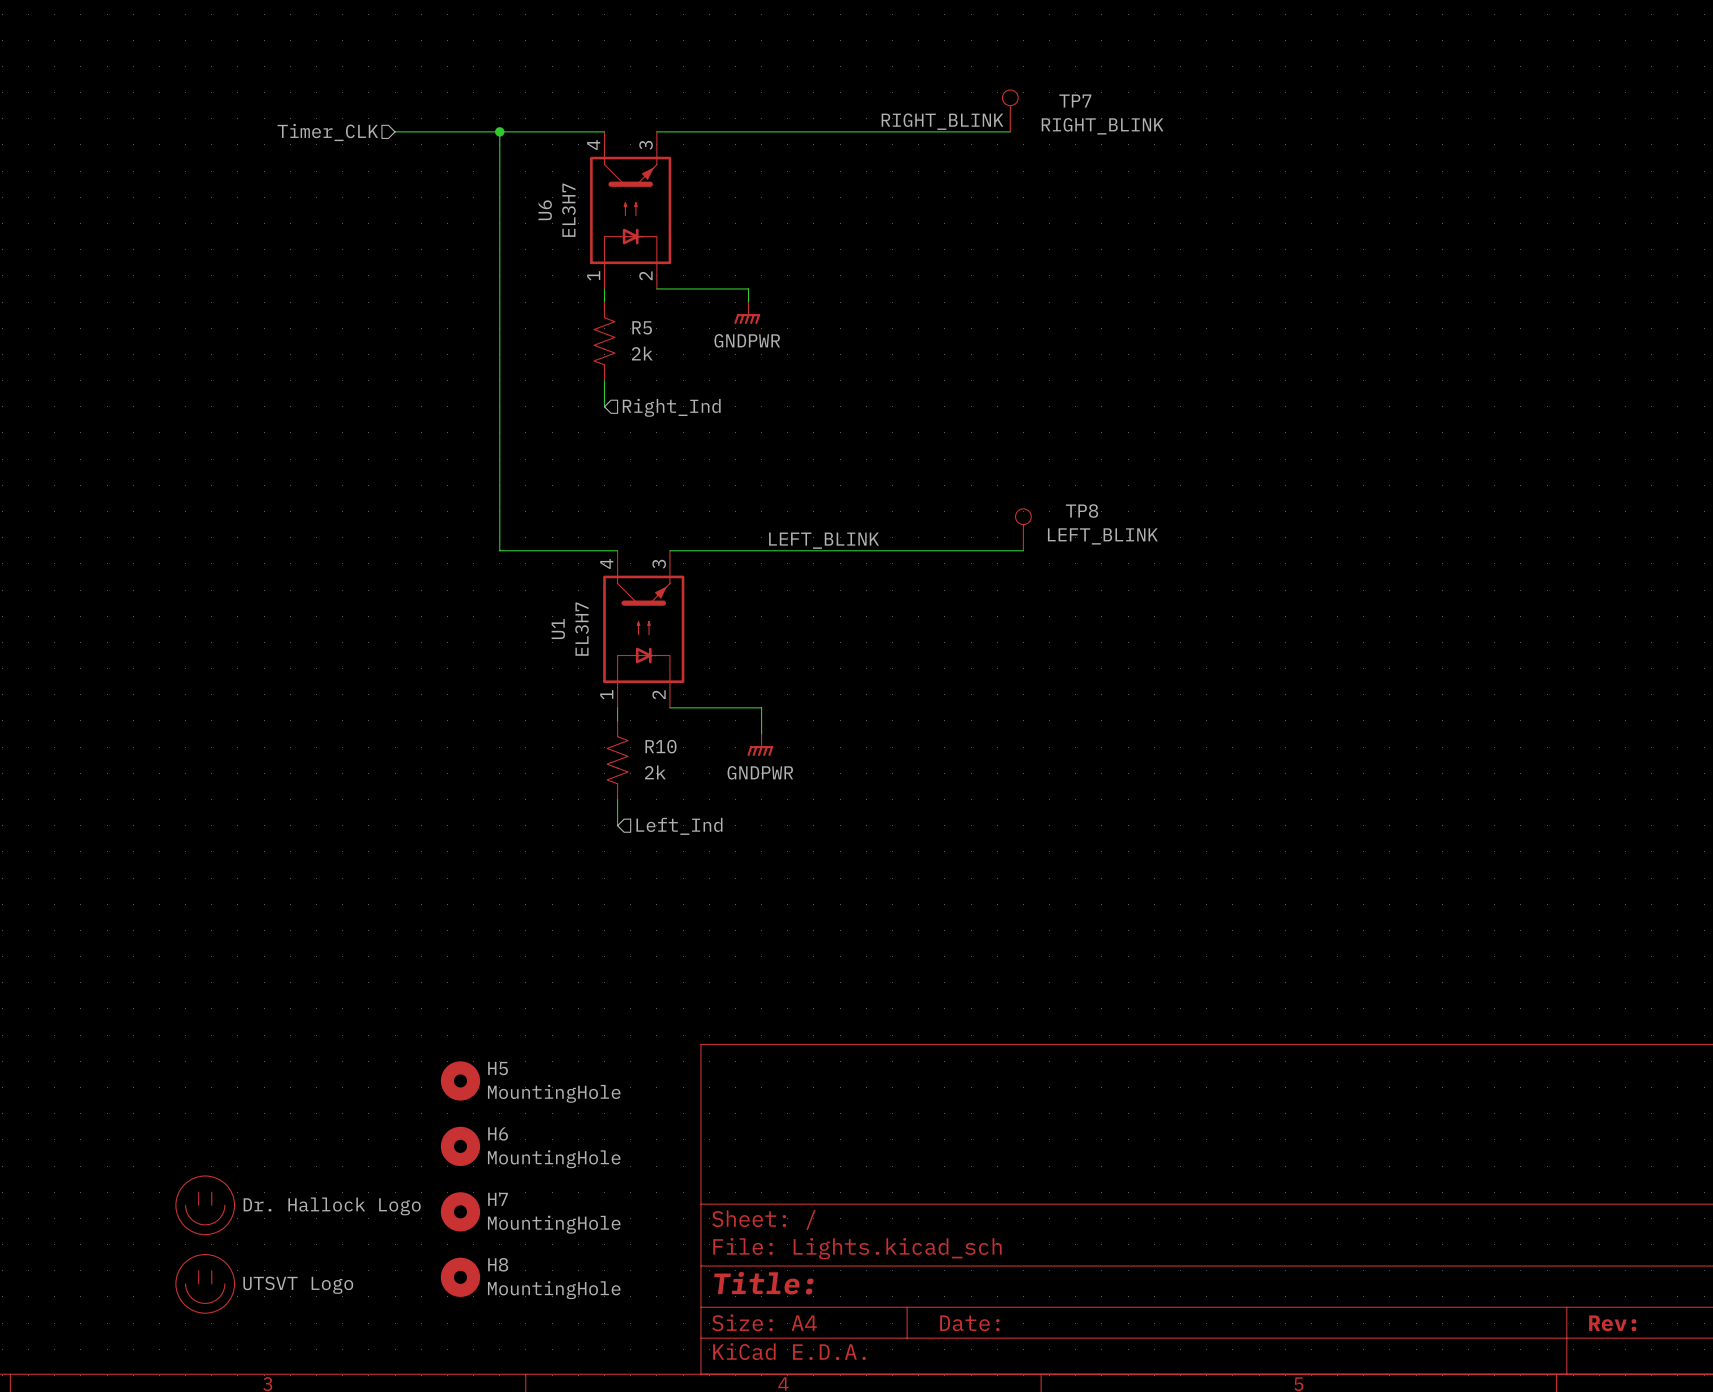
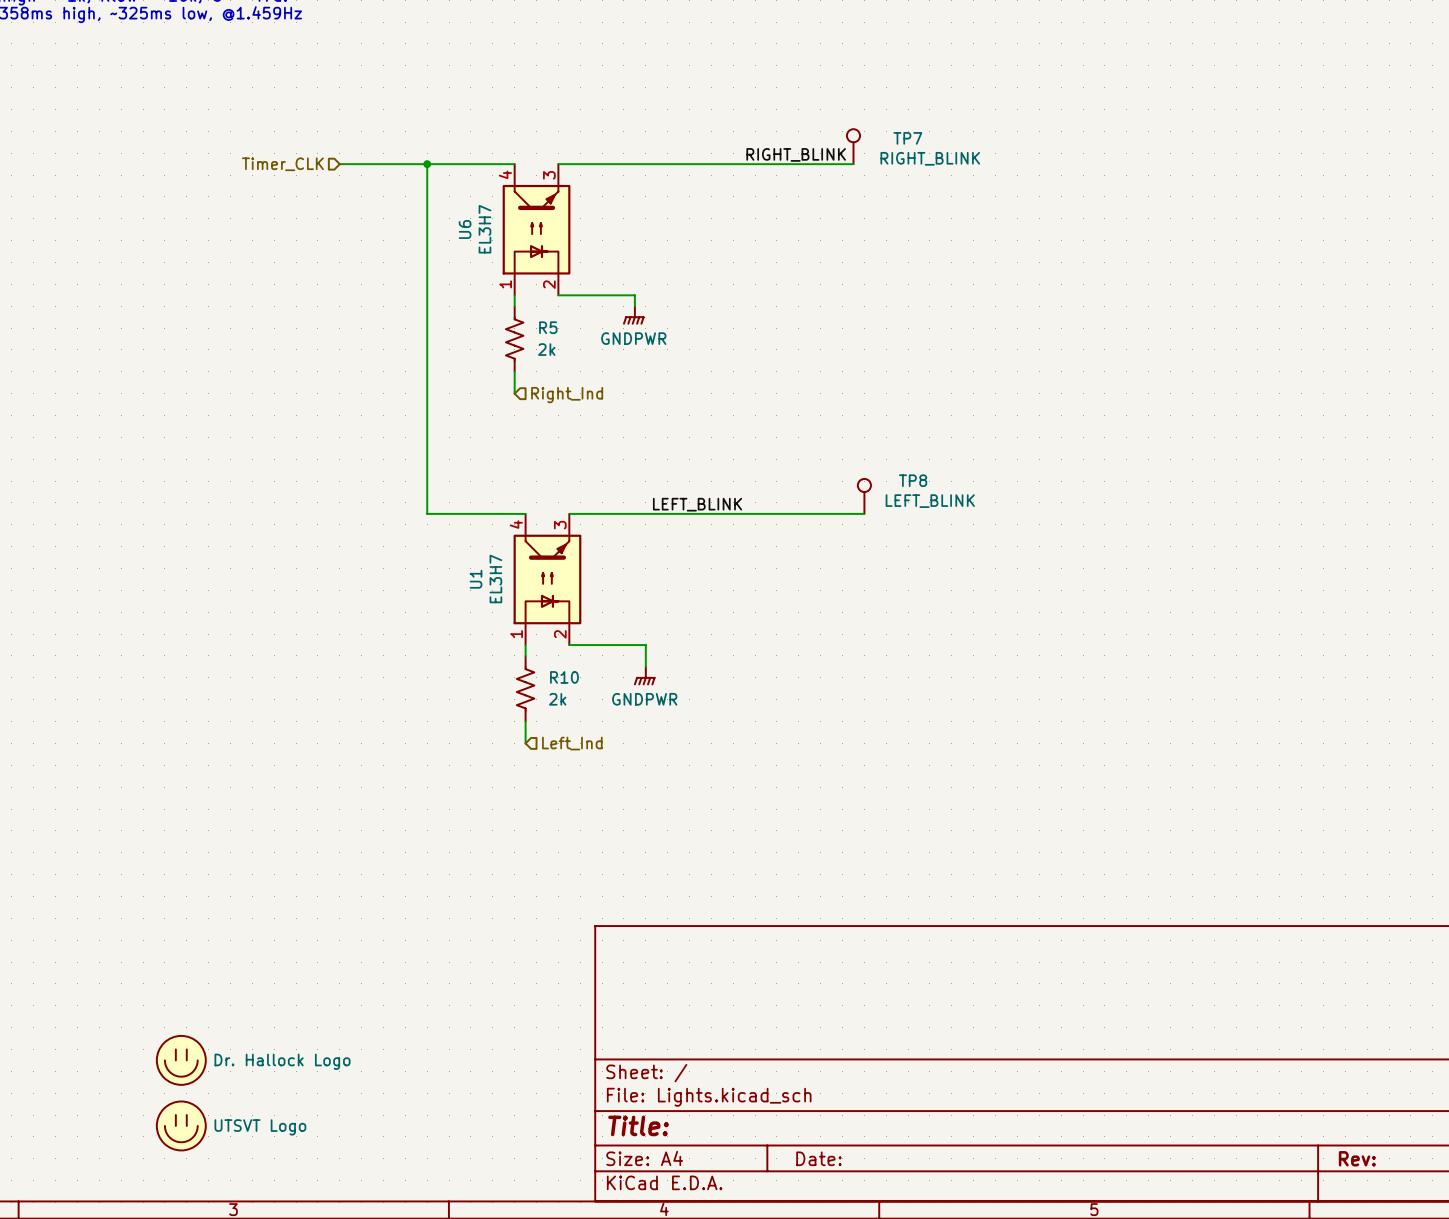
H5: MountingHole (460, 1080) -> none
H6: MountingHole (460, 1146) -> none
H7: MountingHole (460, 1211) -> none
H8: MountingHole (460, 1277) -> none

